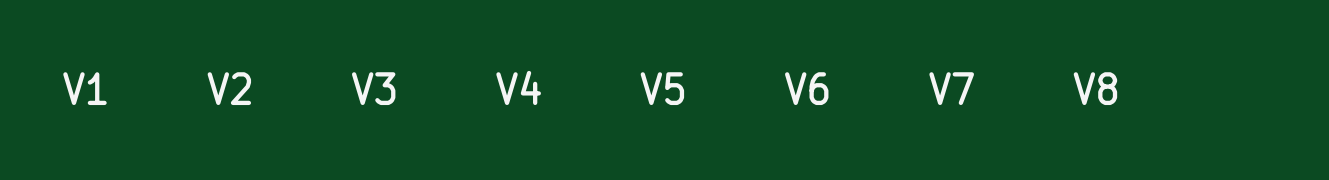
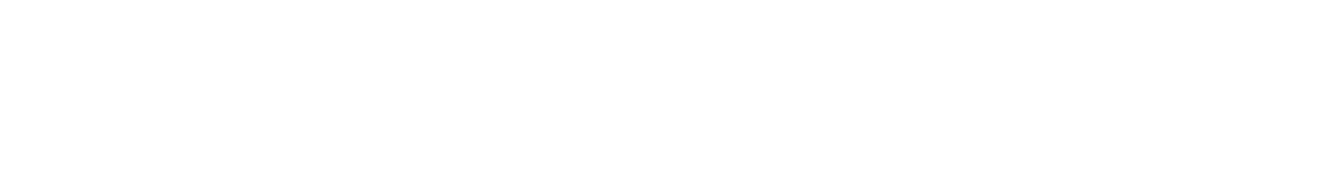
text: V1 V2 V3 V4 V5 V6 V7 V8 (590, 87) -> none

